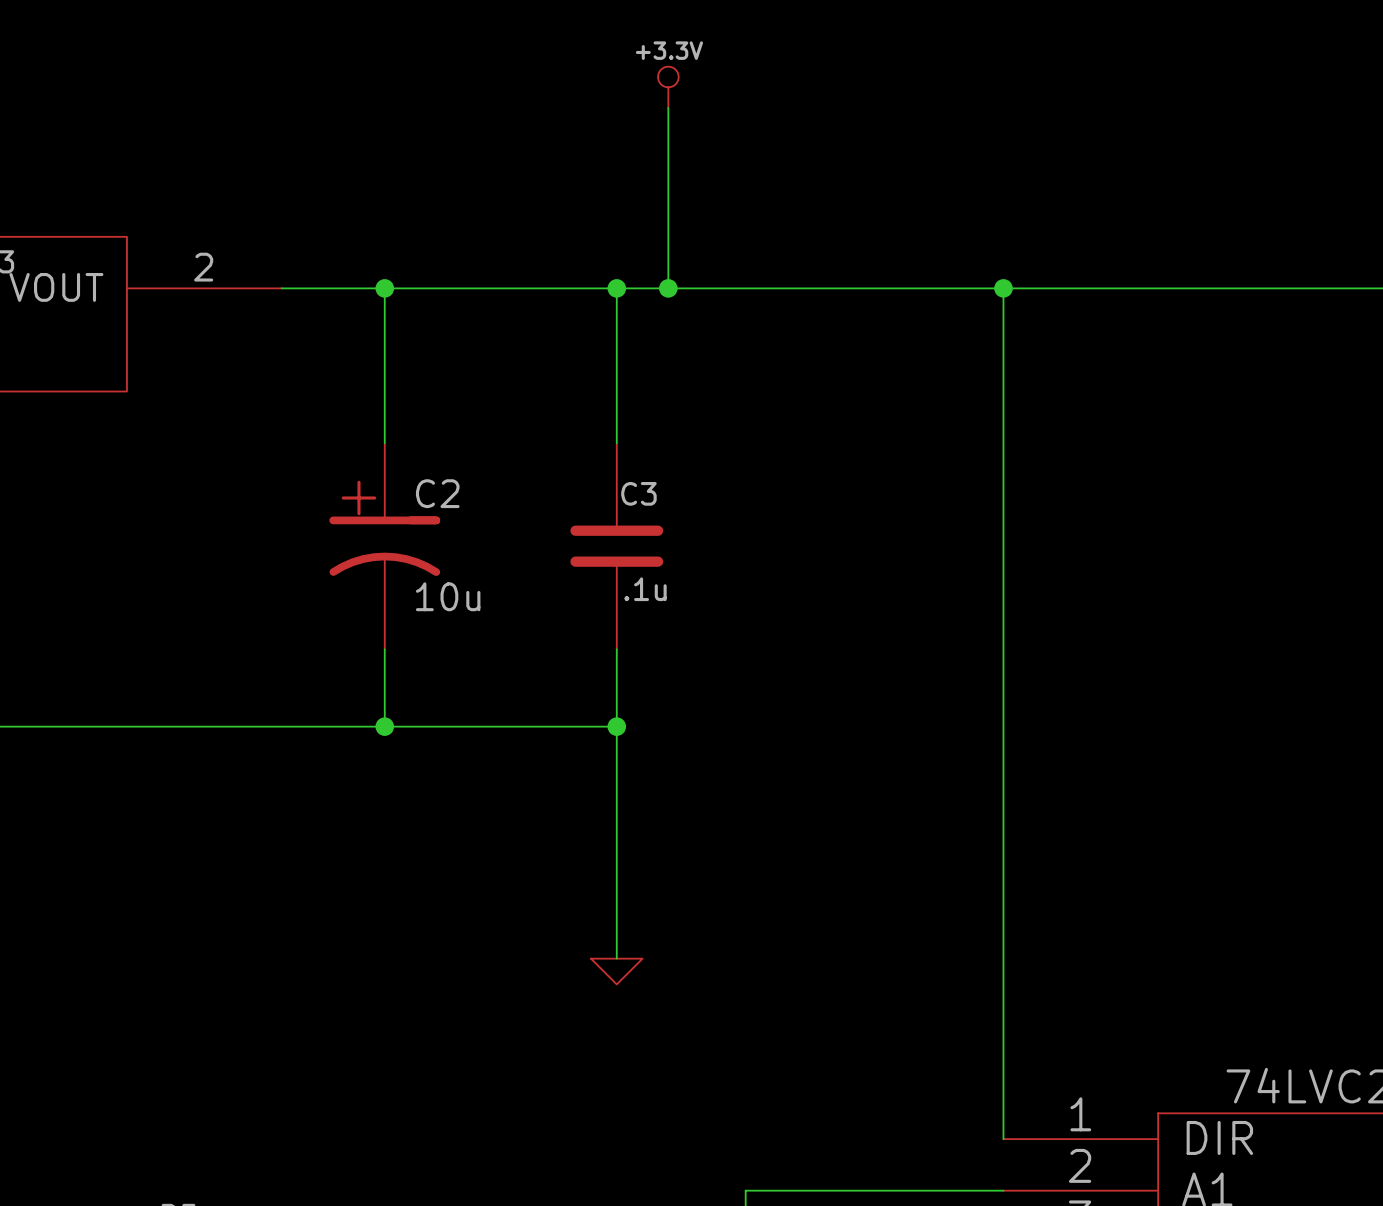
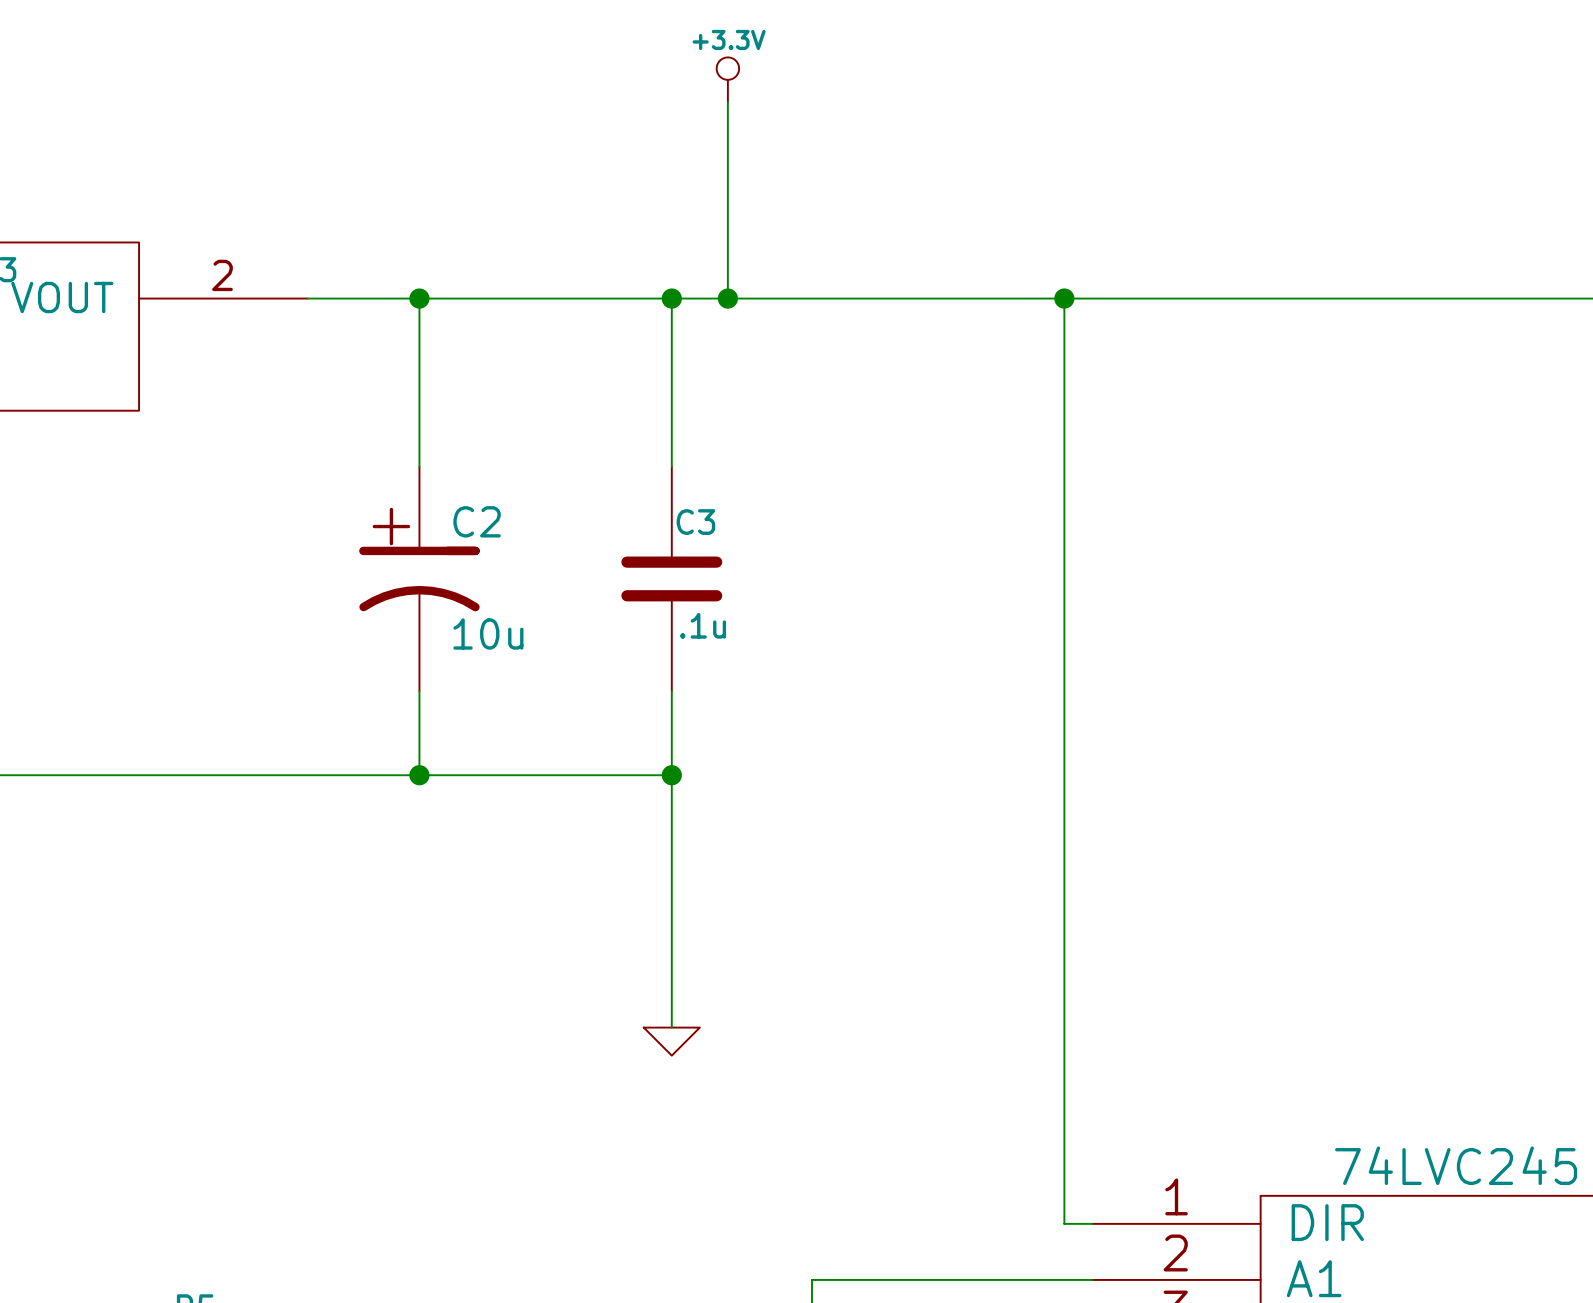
wire: (1003, 288) (1003, 1139) -> (1064, 298) (1064, 1223) (1092, 1223)
junction position: (1003, 288) -> (1064, 298)

